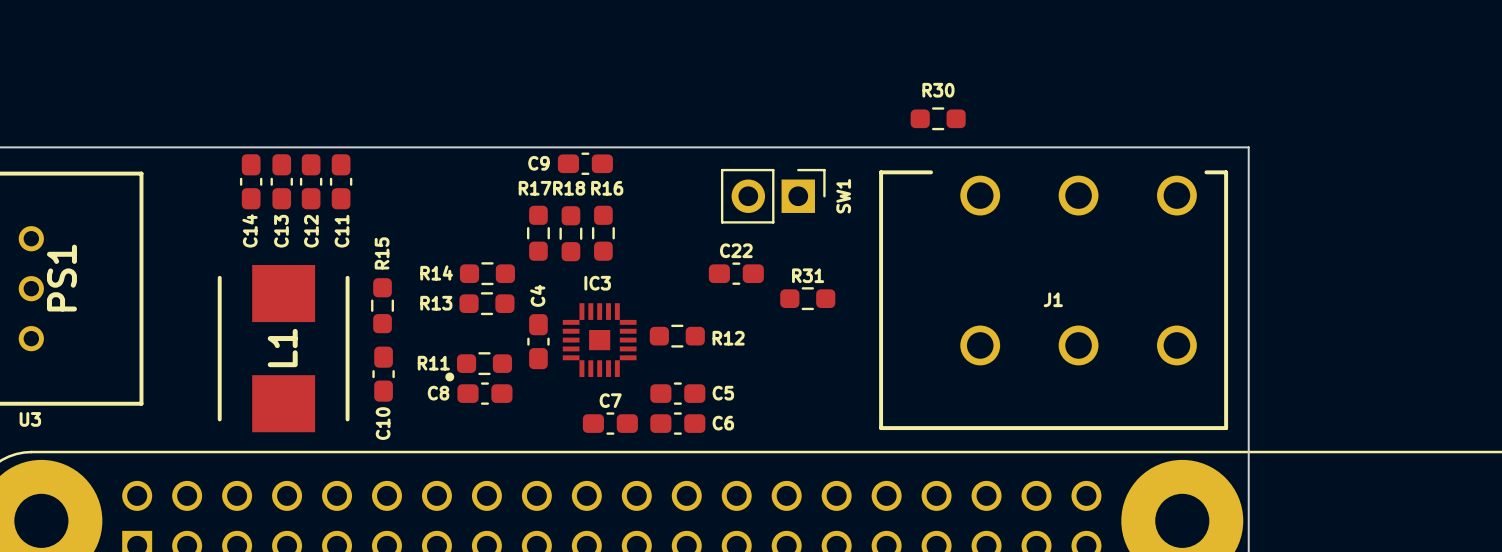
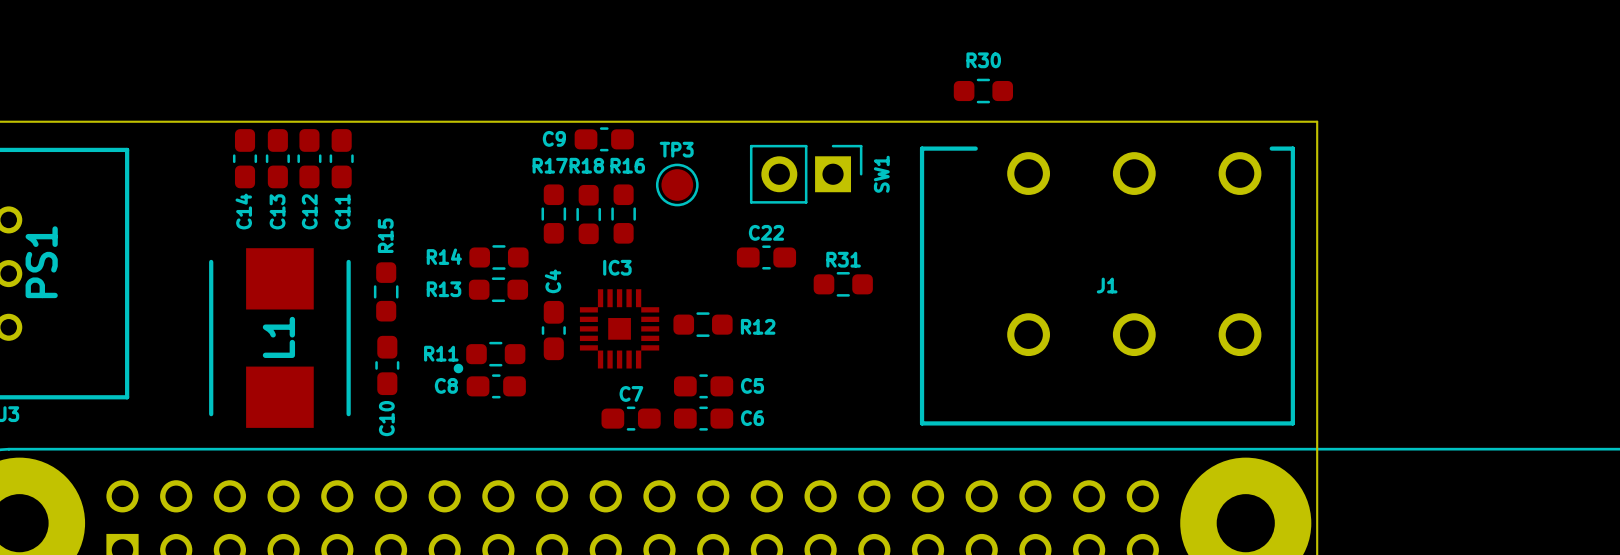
TP3: none -> (677, 184)

